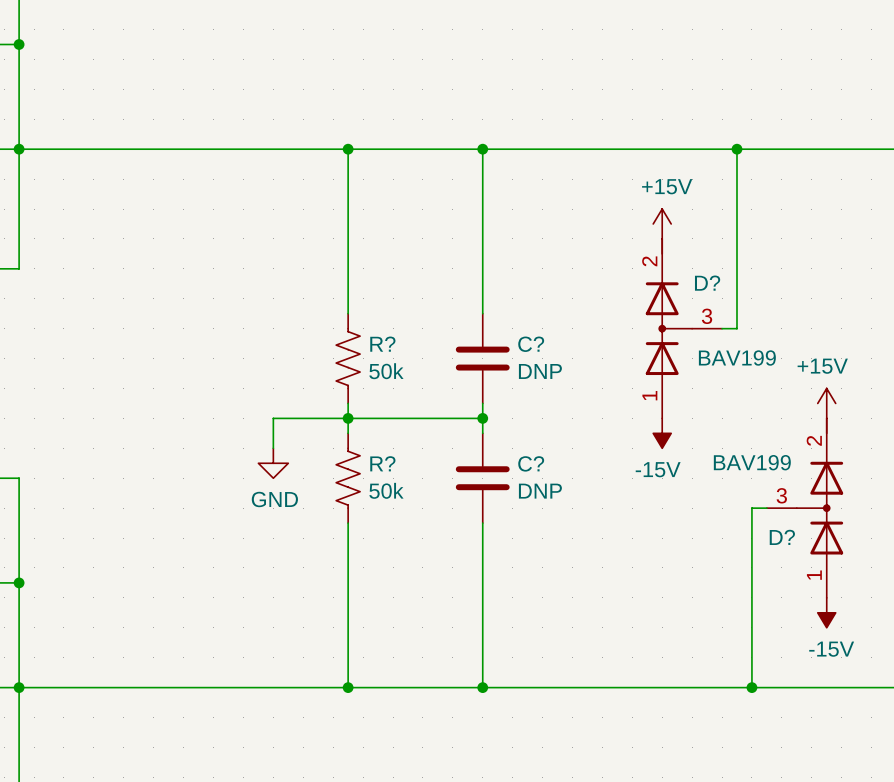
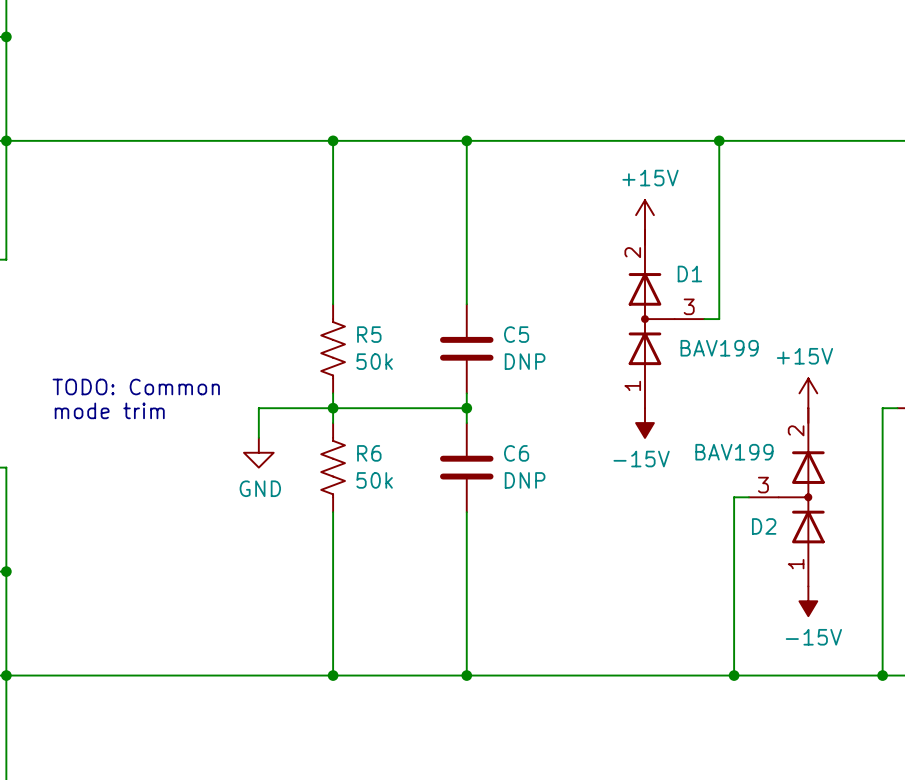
D? name: D? (707, 283) -> D1 (689, 273)
R? name: R? (382, 344) -> R5 (369, 334)
C? name: C? (531, 344) -> C5 (516, 334)
text: none -> TODO: Common (136, 386)
text: none -> mode trim (109, 410)
R? name: R? (382, 463) -> R6 (369, 453)
C? name: C? (531, 463) -> C6 (516, 453)
D? name: D? (782, 537) -> D2 (764, 526)

